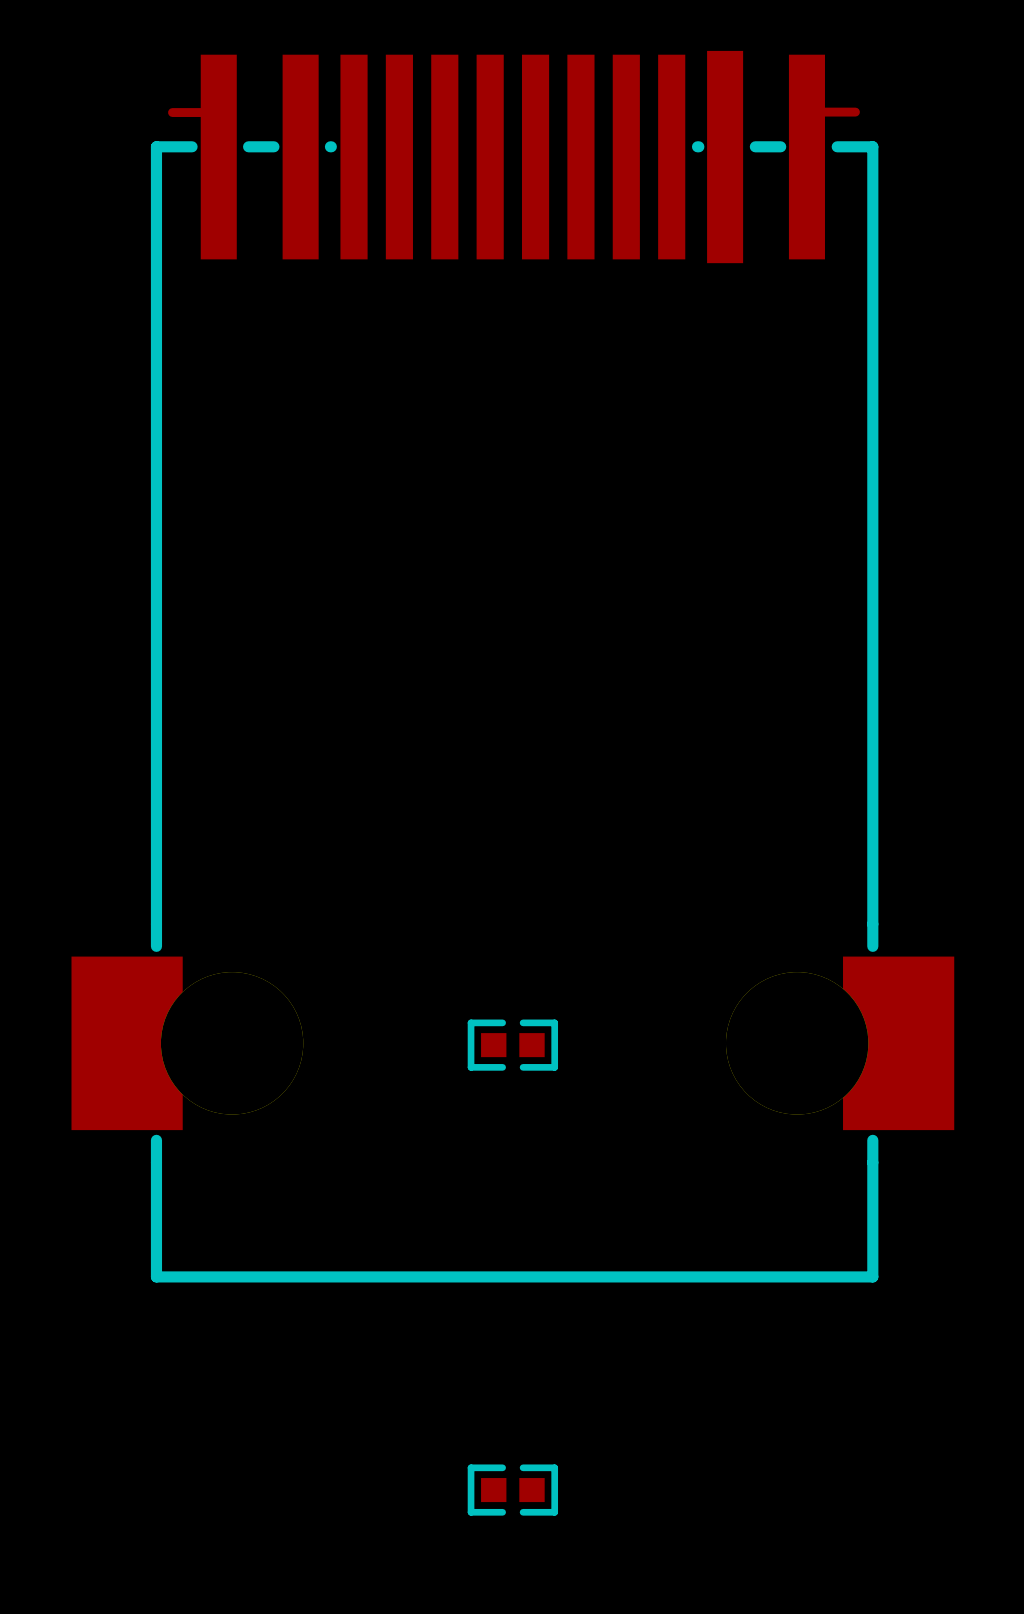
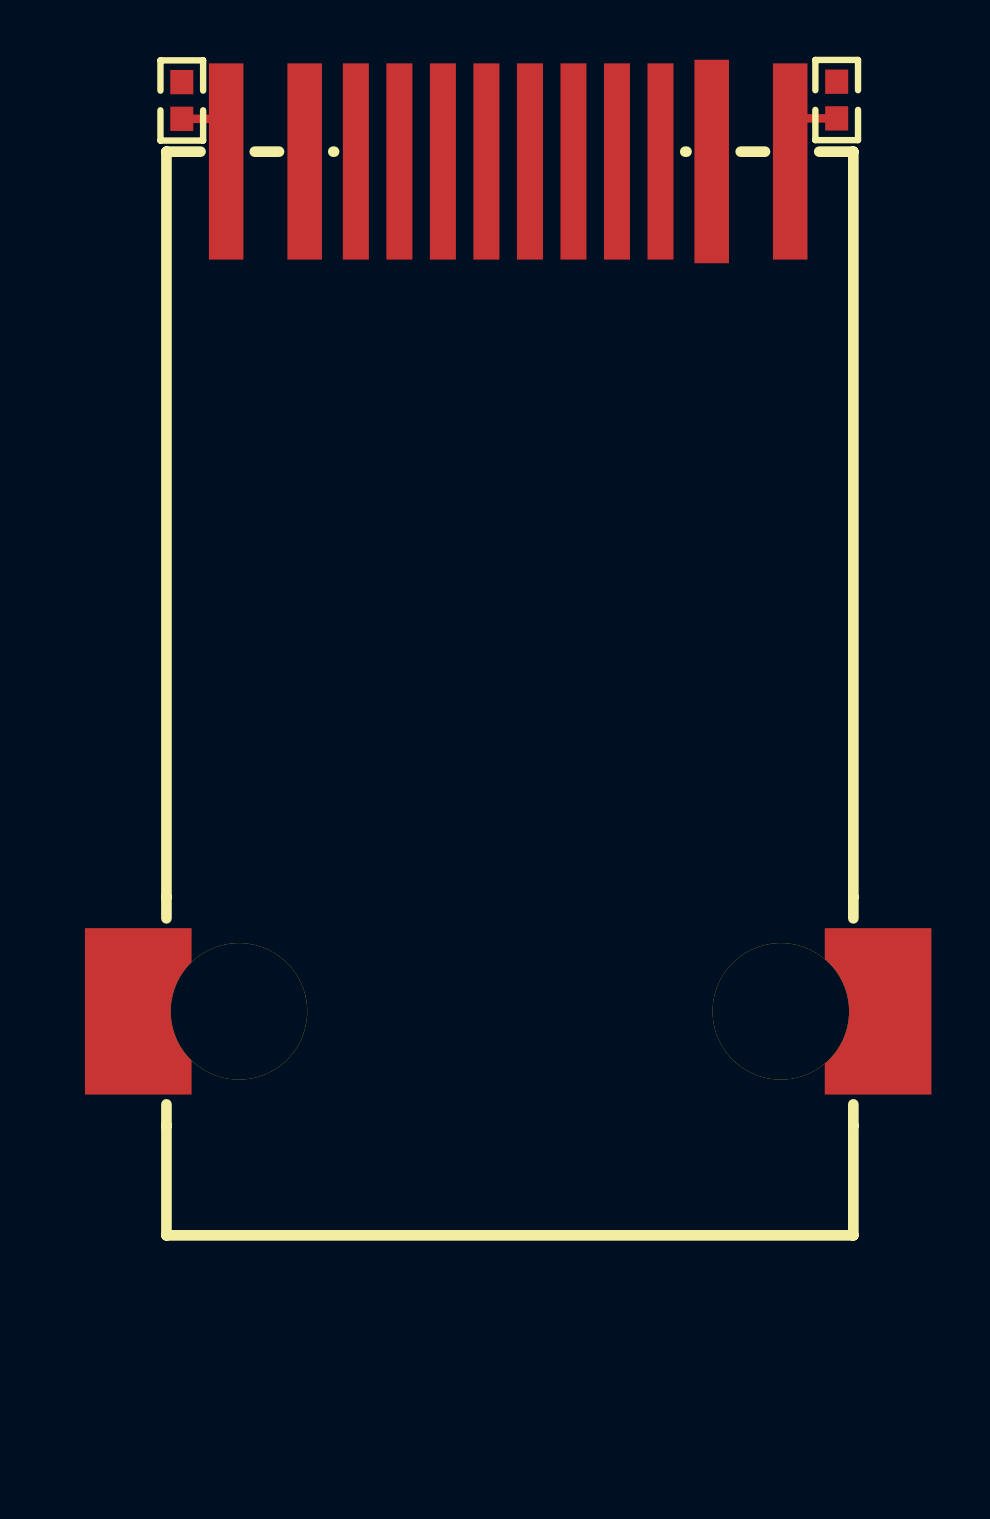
part: none -> (836, 100)
part: none -> (181, 100)
part: (512, 1045) -> none
part: (512, 1490) -> none

